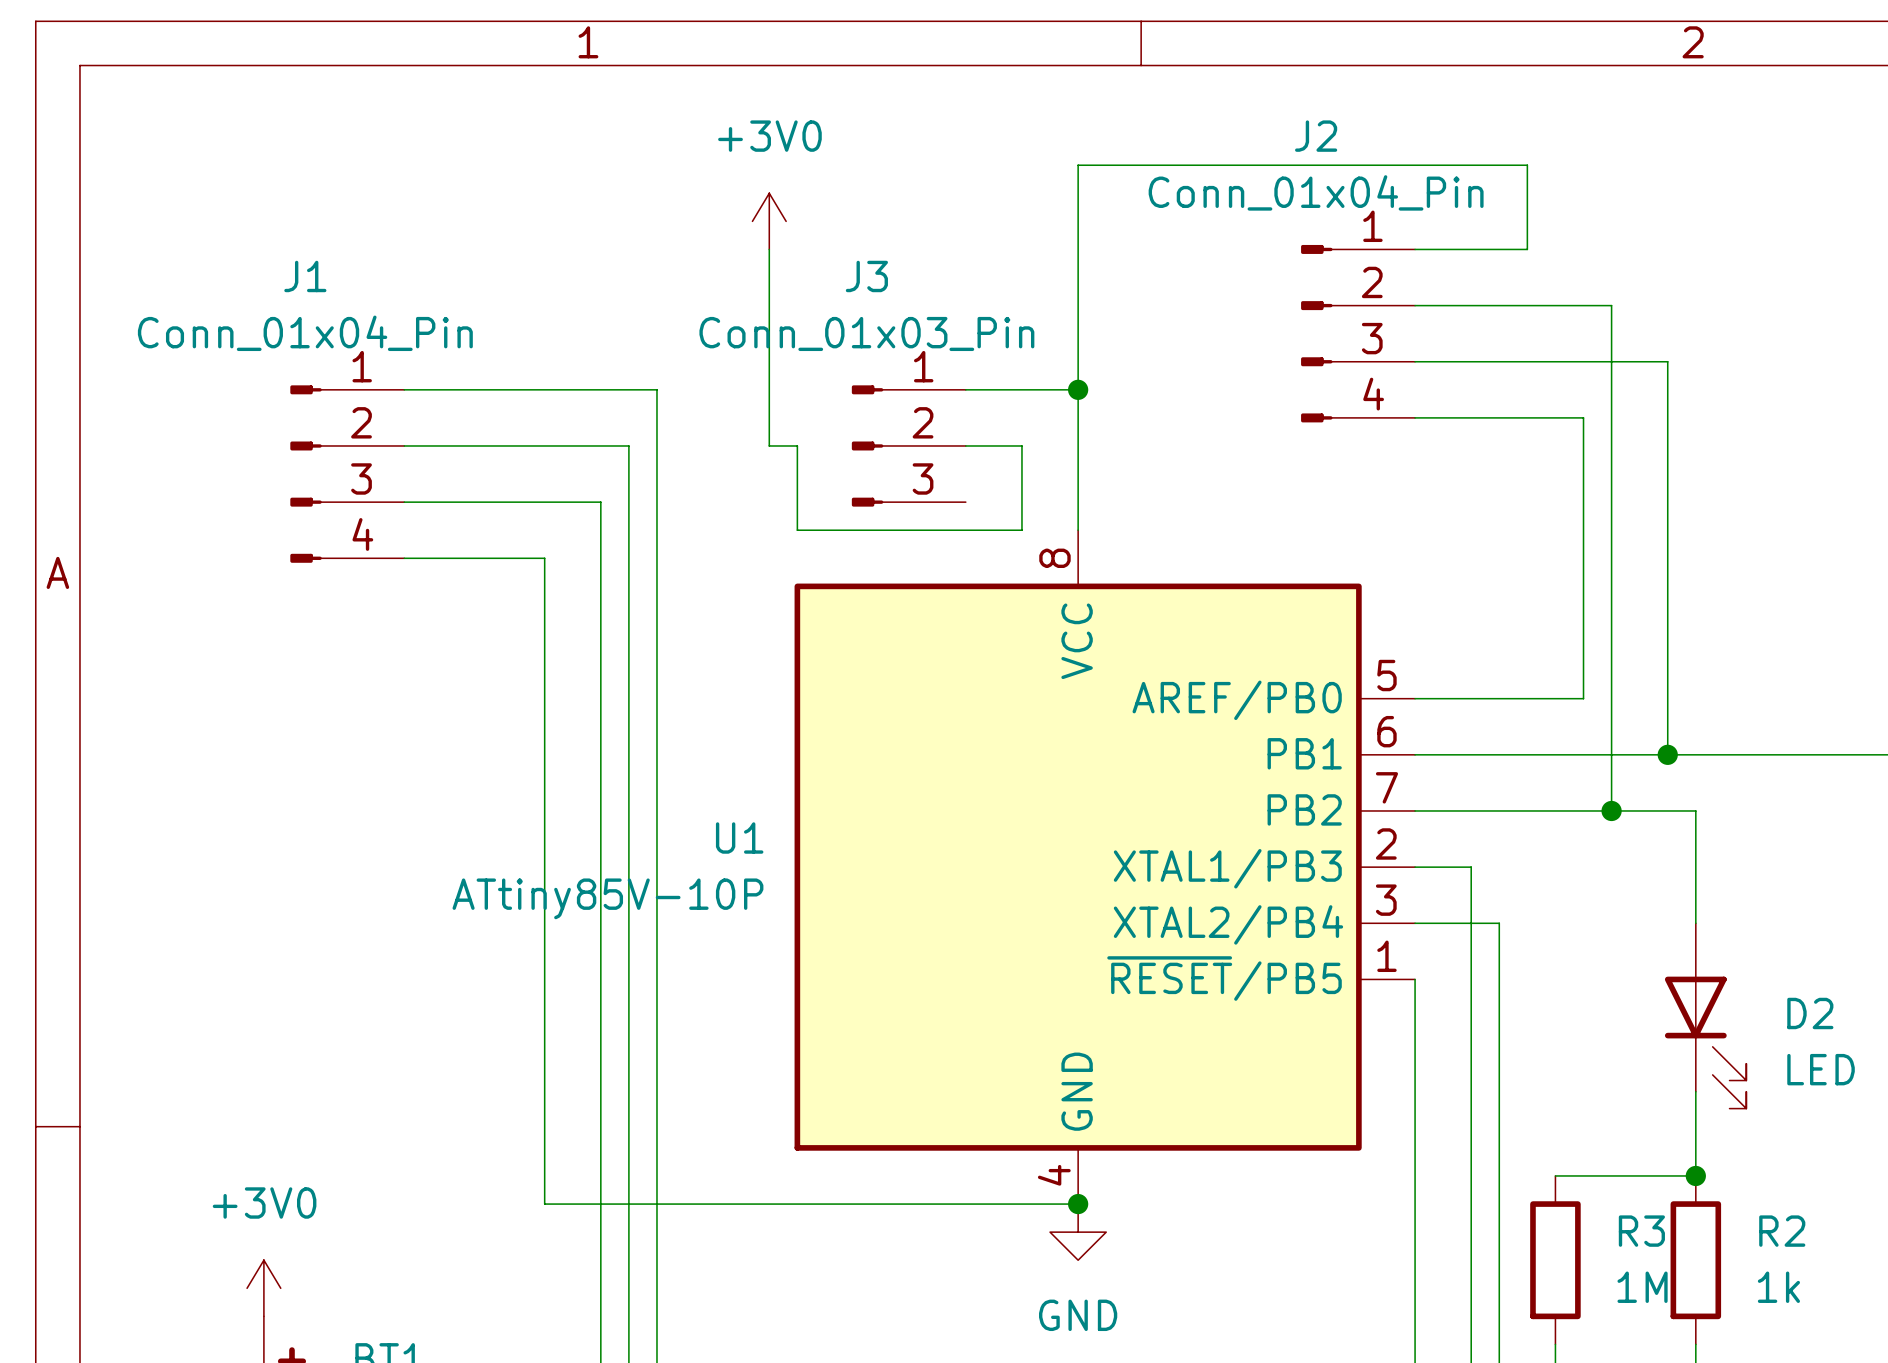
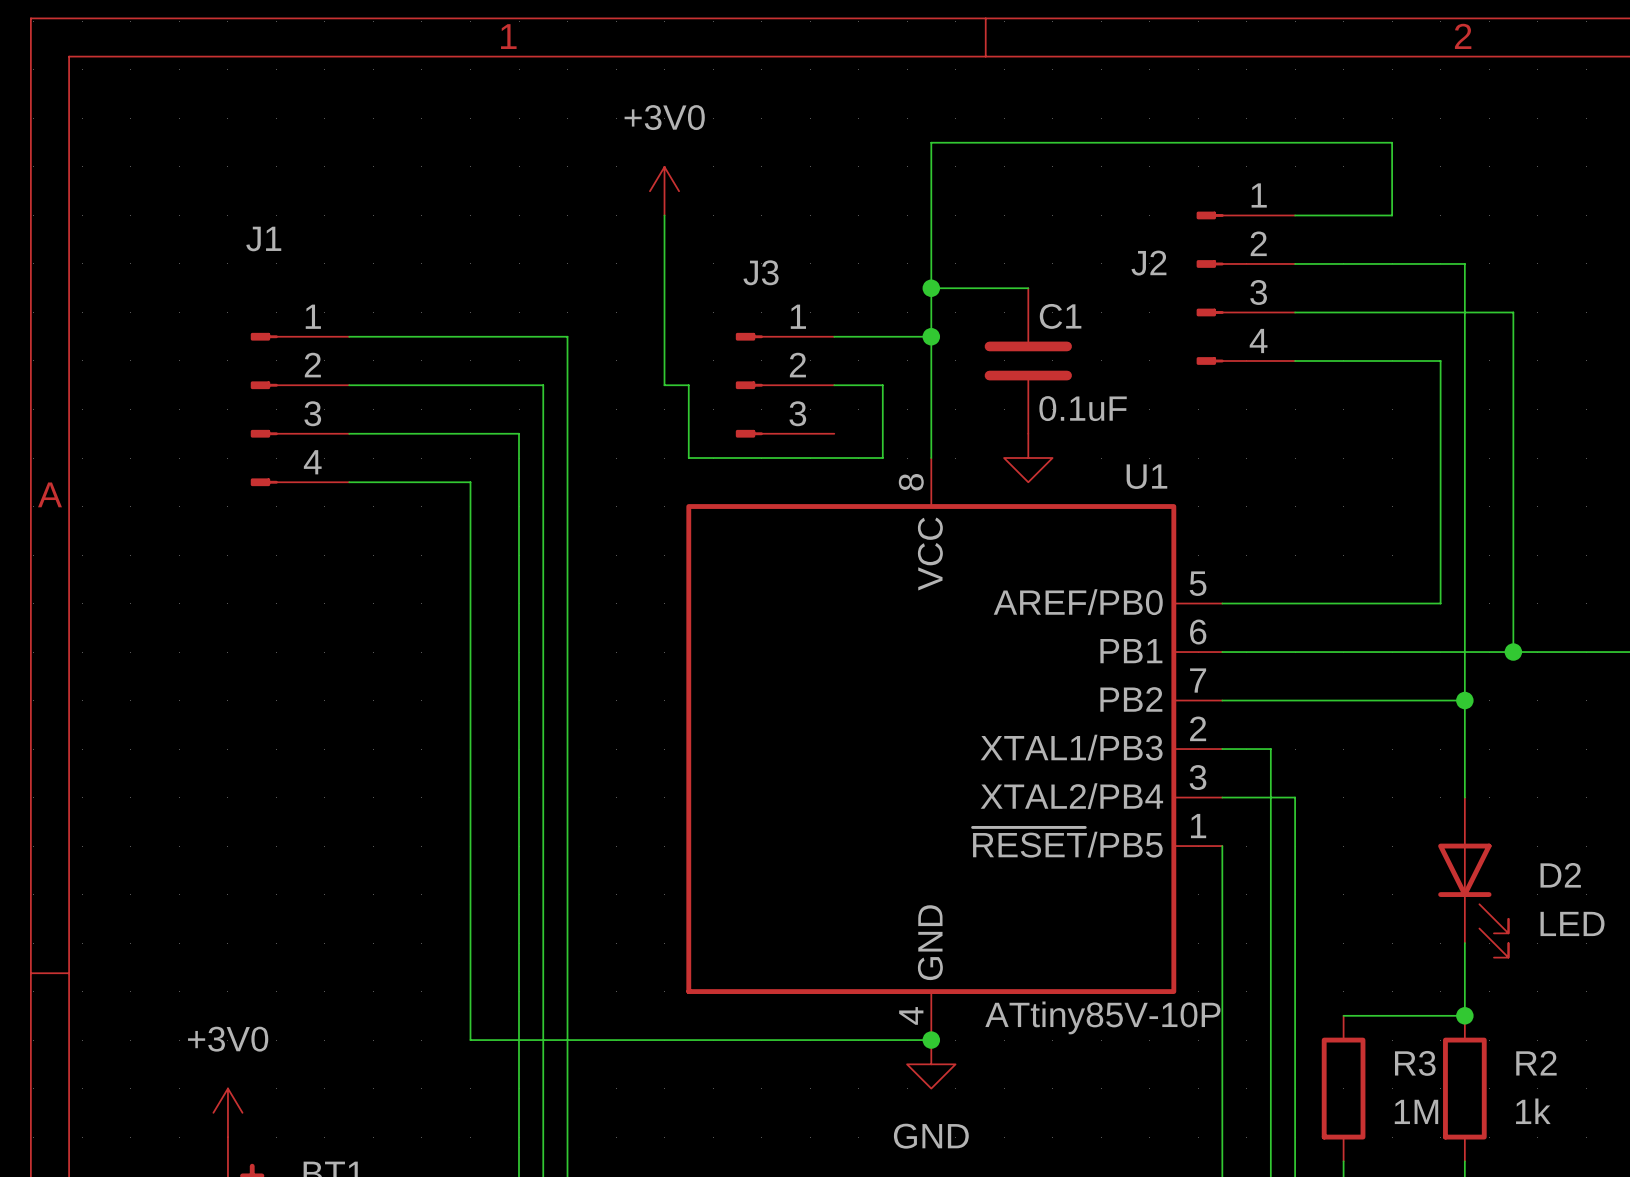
J2 name position: J2 (1316, 136) -> J2 (1148, 263)
wire: (1527, 165) (1527, 249) -> (1319, 142) (1392, 142) (1392, 215) (1319, 215)
J2 value: Conn_01x04_Pin (1316, 192) -> none
J3 name position: J3 (866, 276) -> J3 (761, 272)
wire: (1611, 305) (1611, 810) -> (1392, 263) (1464, 263) (1464, 700)
J1 value: Conn_01x04_Pin (305, 333) -> none
J3 value: Conn_01x03_Pin (866, 333) -> none
wire: none -> (931, 288) (1028, 288)
junction: none -> (931, 288)
J2 position: (1358, 333) -> (1245, 288)
wire: (1667, 361) (1667, 417) -> (1367, 360) (1440, 360)
wire: none -> (1440, 312) (1513, 312) (1513, 652)
C1: none -> 0.1uF (1028, 360)
wire: (1583, 417) (1583, 698) -> none
power symbol: none -> (1028, 458)
wire: (1667, 698) (1667, 754) -> (1440, 603) (1367, 603)
junction: (1667, 754) -> none
junction: none -> (1513, 652)
junction: (1611, 810) -> none
junction: none -> (1464, 700)
U1 name position: U1 (739, 838) -> U1 (1146, 476)
U1 value position: ATtiny85V-10P (607, 898) -> ATtiny85V-10P (1102, 1017)

